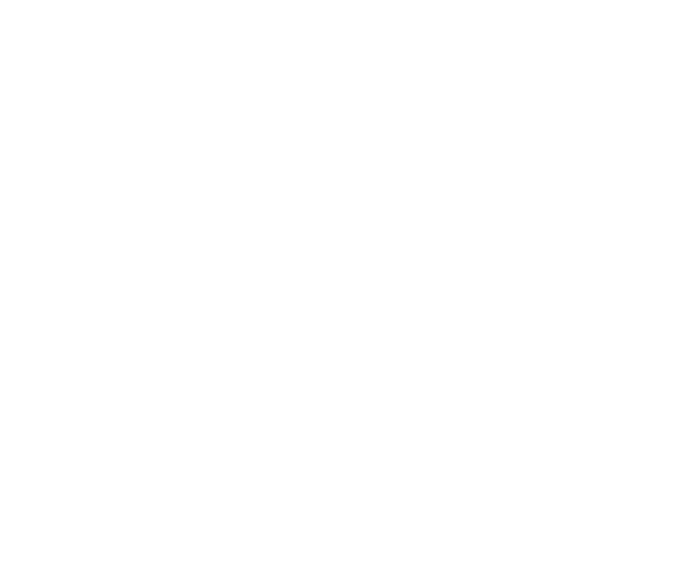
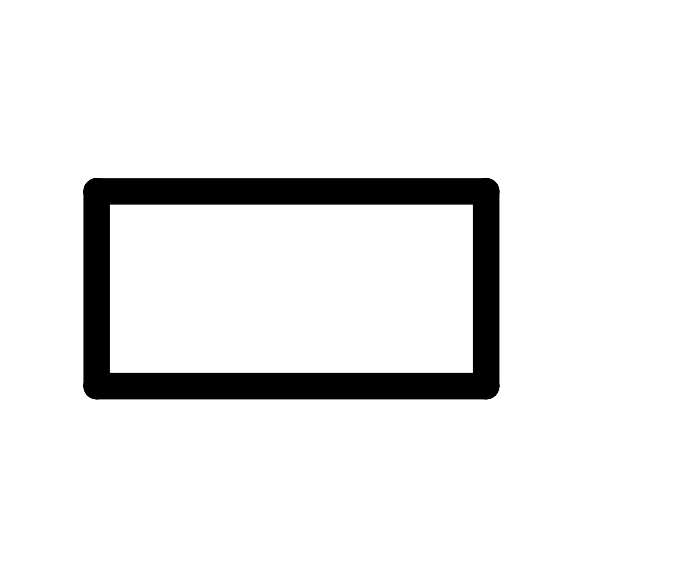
board edge: none -> (486, 191) (486, 386) (96, 386) (96, 191) (486, 191)

